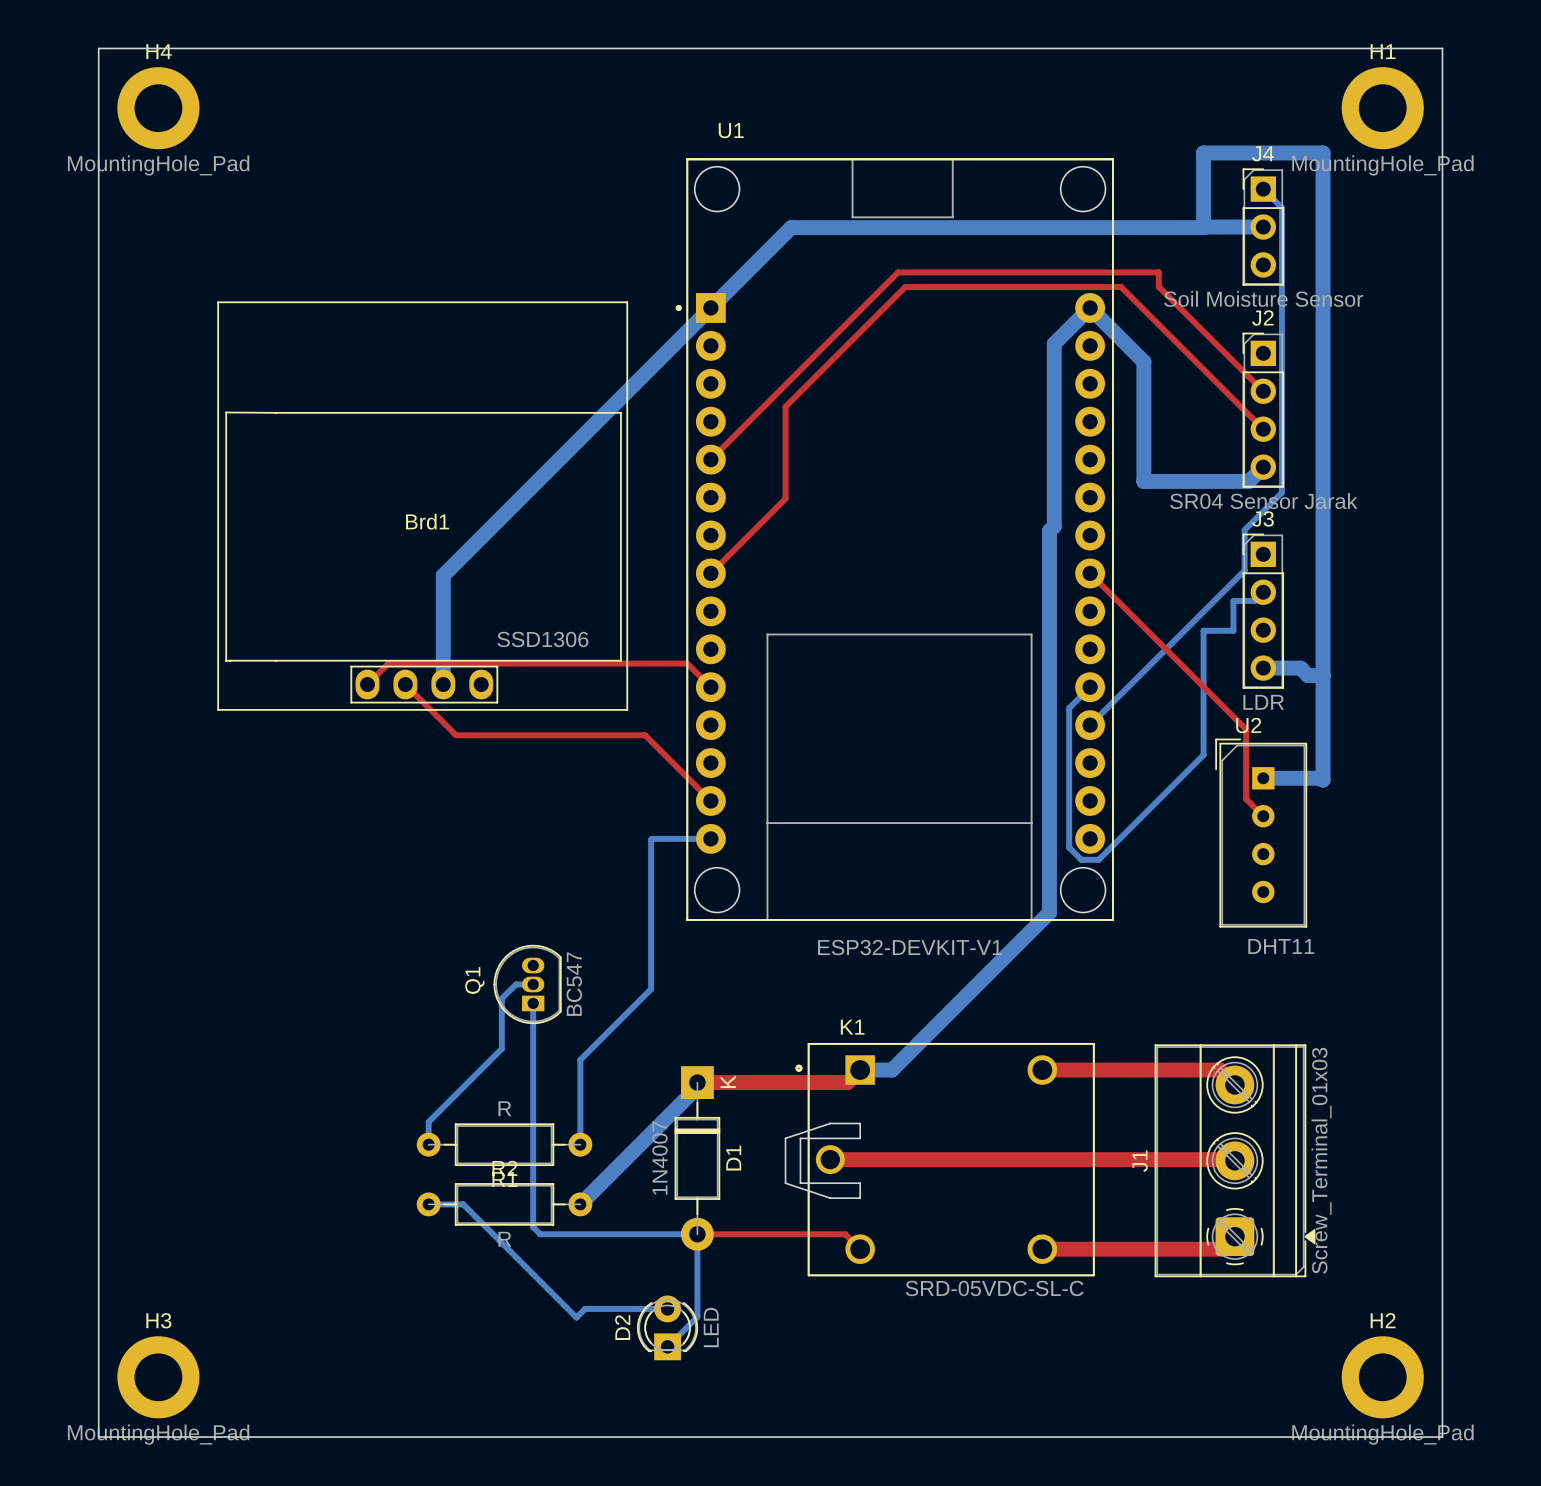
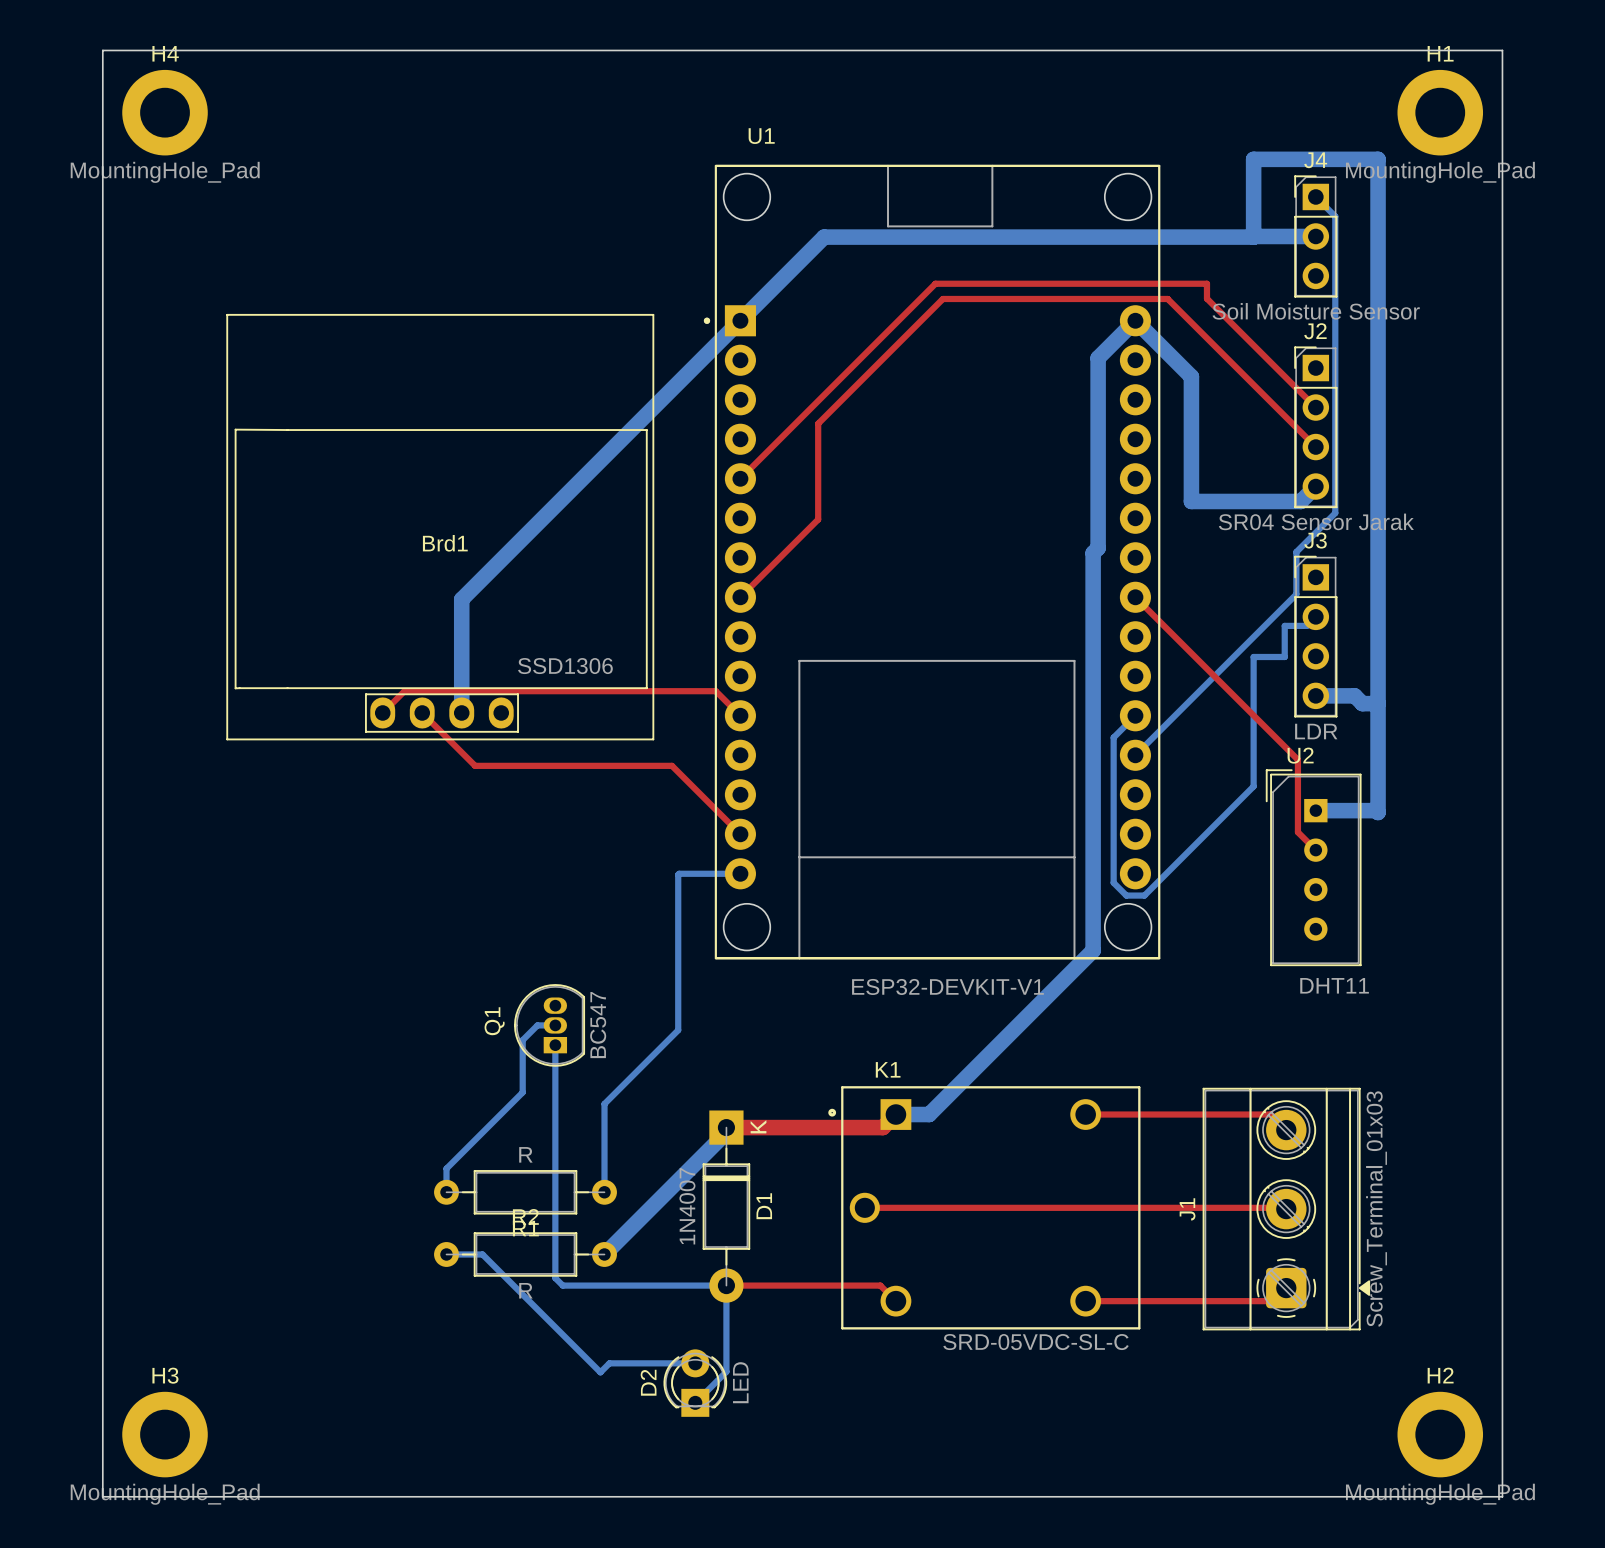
top track width: thick (1042, 1070) (1220, 1070) (1234, 1084) -> thin (1085, 1114) (1270, 1114) (1286, 1130)
board edge: (830, 1123) (860, 1123) (860, 1138) (800, 1138) (800, 1183) (860, 1183) (860, 1198) (830, 1198) (785, 1183) (785, 1138) (830, 1123) -> none
top track width: thick (830, 1159) (1234, 1160) -> thin (864, 1207) (1286, 1209)
top track width: thick (1234, 1236) (1222, 1249) (1042, 1249) -> thin (1286, 1288) (1273, 1301) (1085, 1301)

